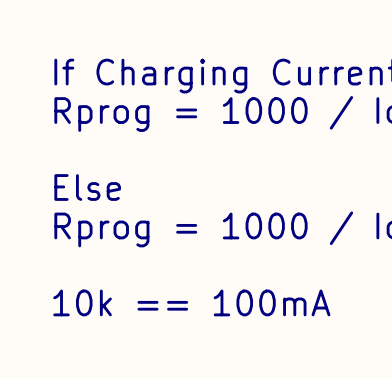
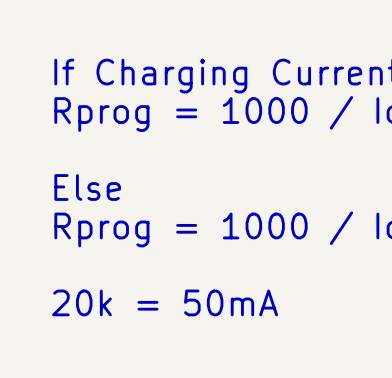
text: 10k == 100mA (191, 302) -> 20k = 50mA (165, 302)

